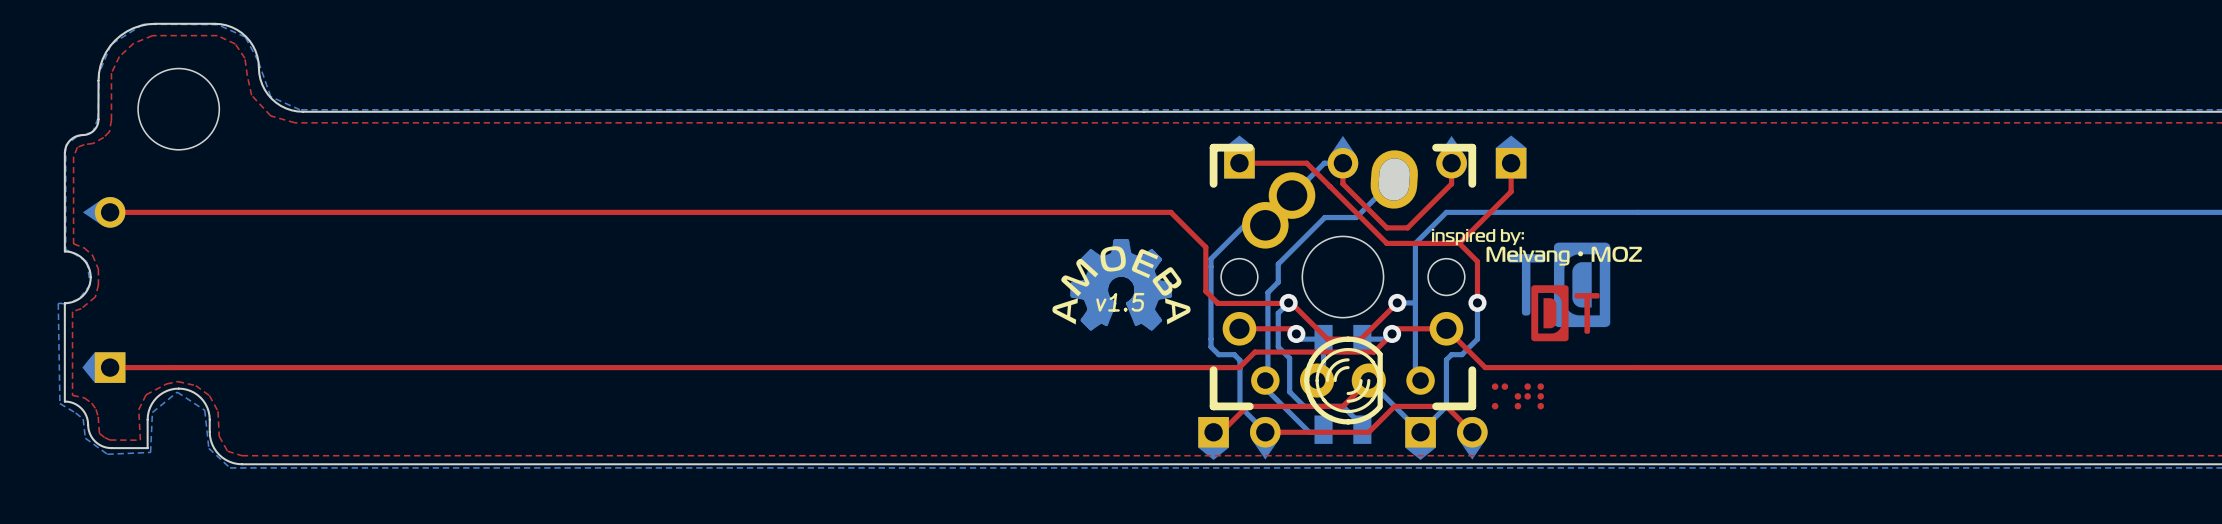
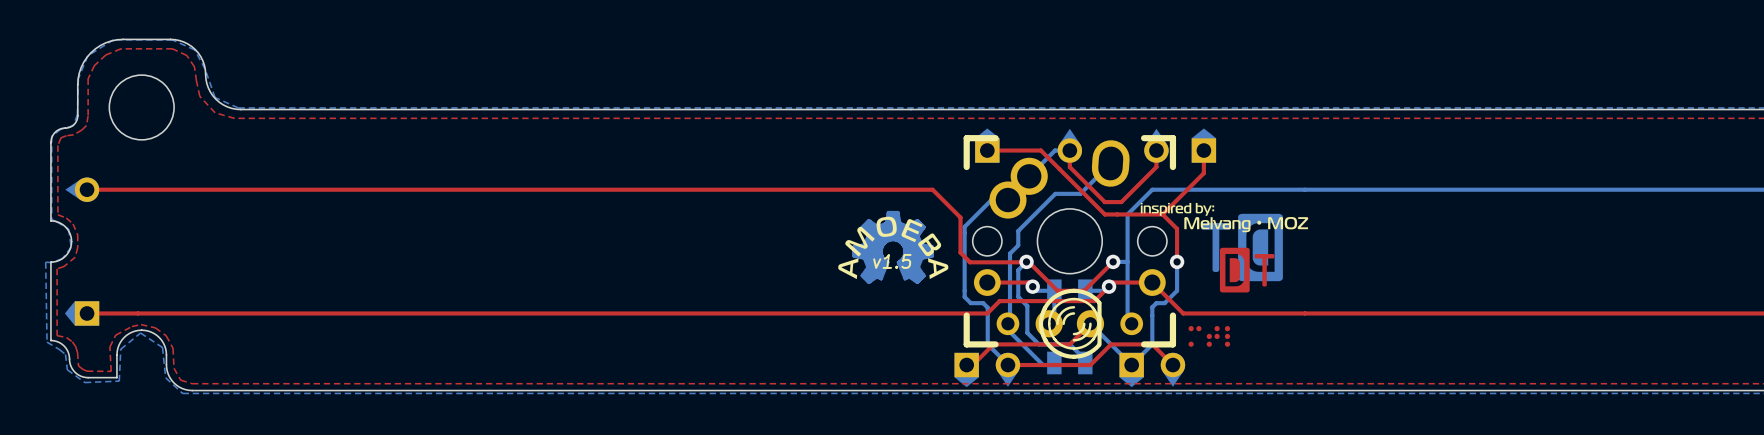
board edge: (1394, 173) (1393, 185) (1394, 173) -> none

